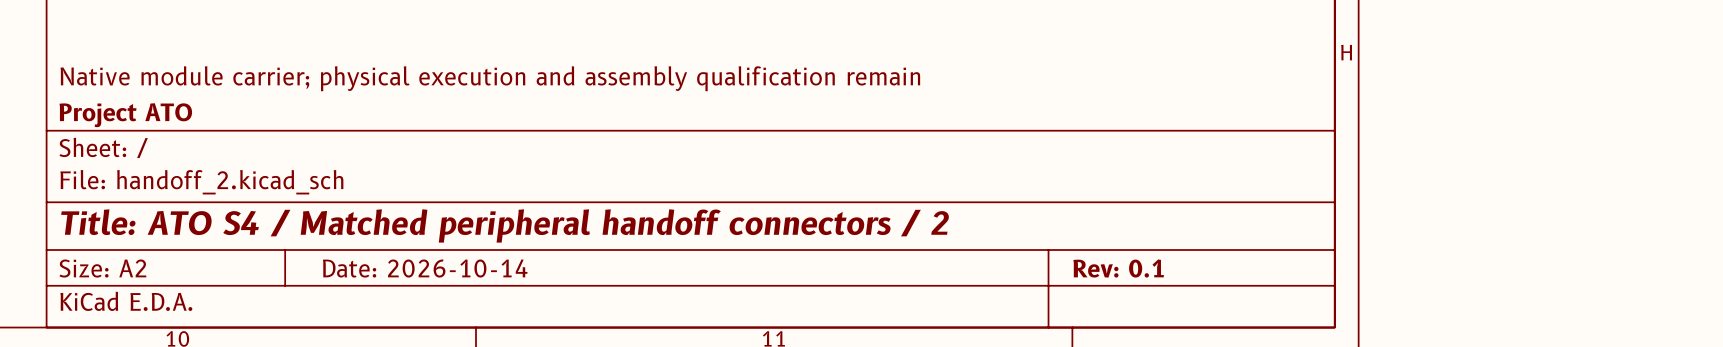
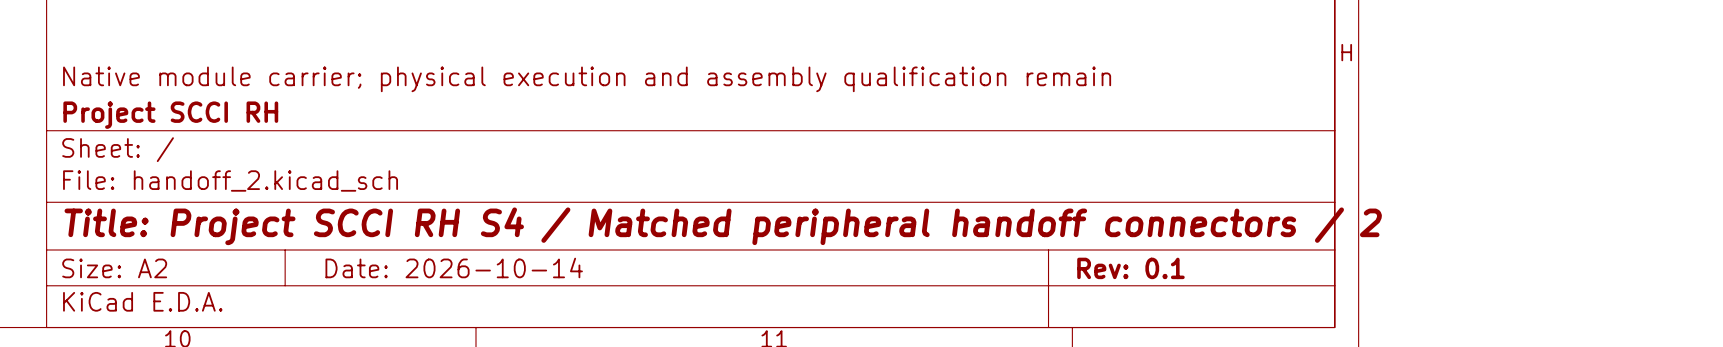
title block: Project ATO (125, 115) -> Project SCCI RH (170, 115)
title block: Title: ATO S4 / Matched peripheral handoff connectors / 2 (505, 225) -> Title: Project SCCI RH S4 / Matched peripheral handoff connectors / 2 (723, 226)

